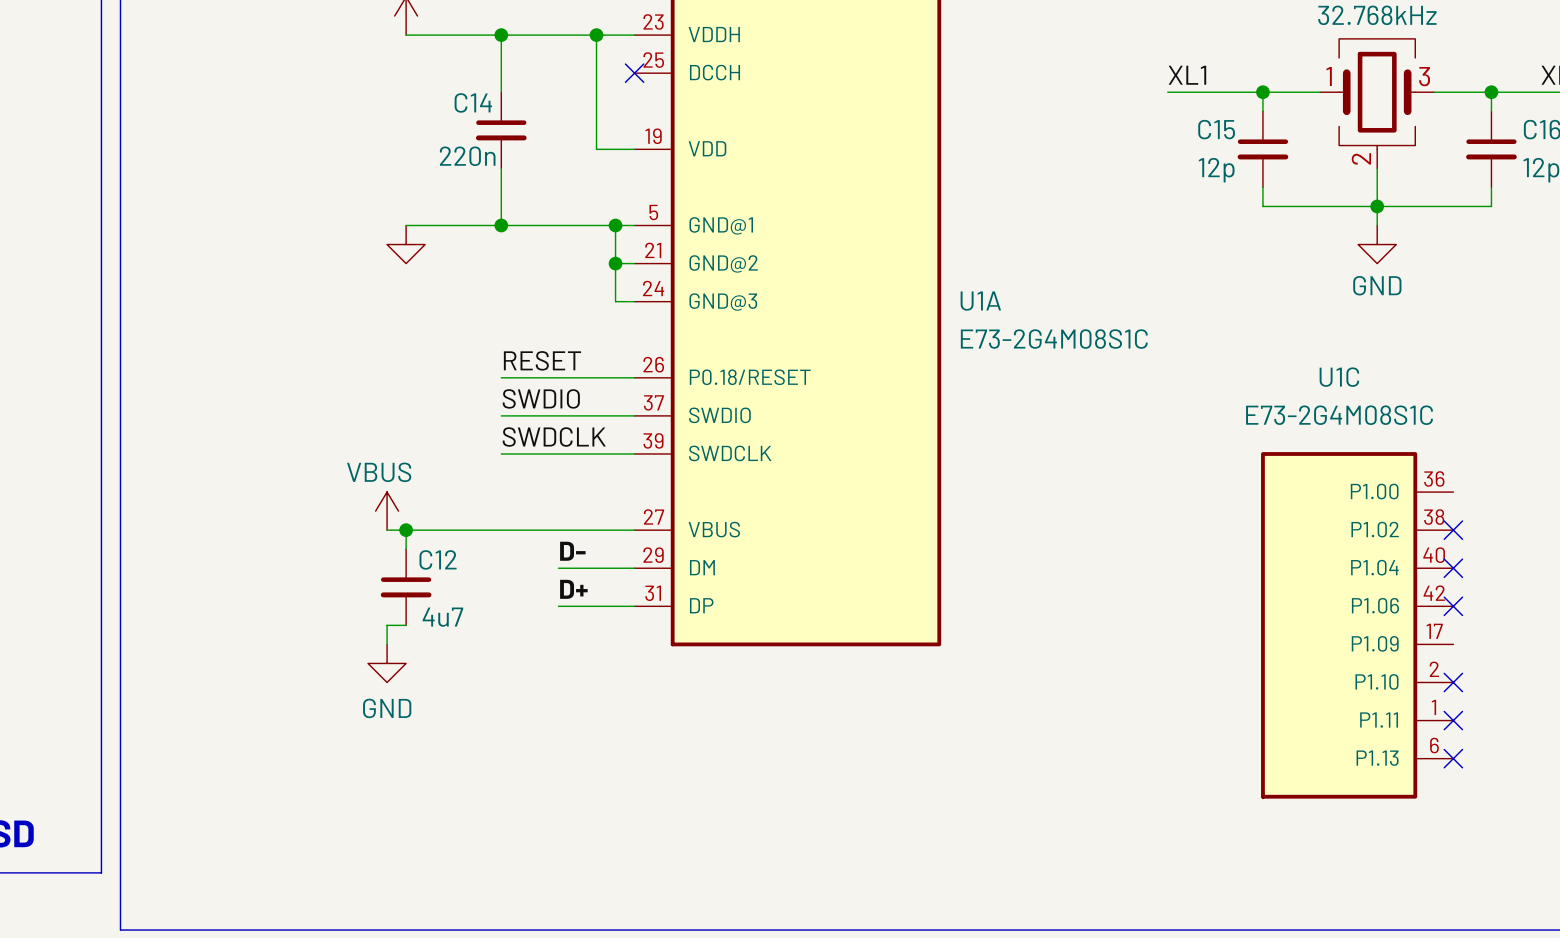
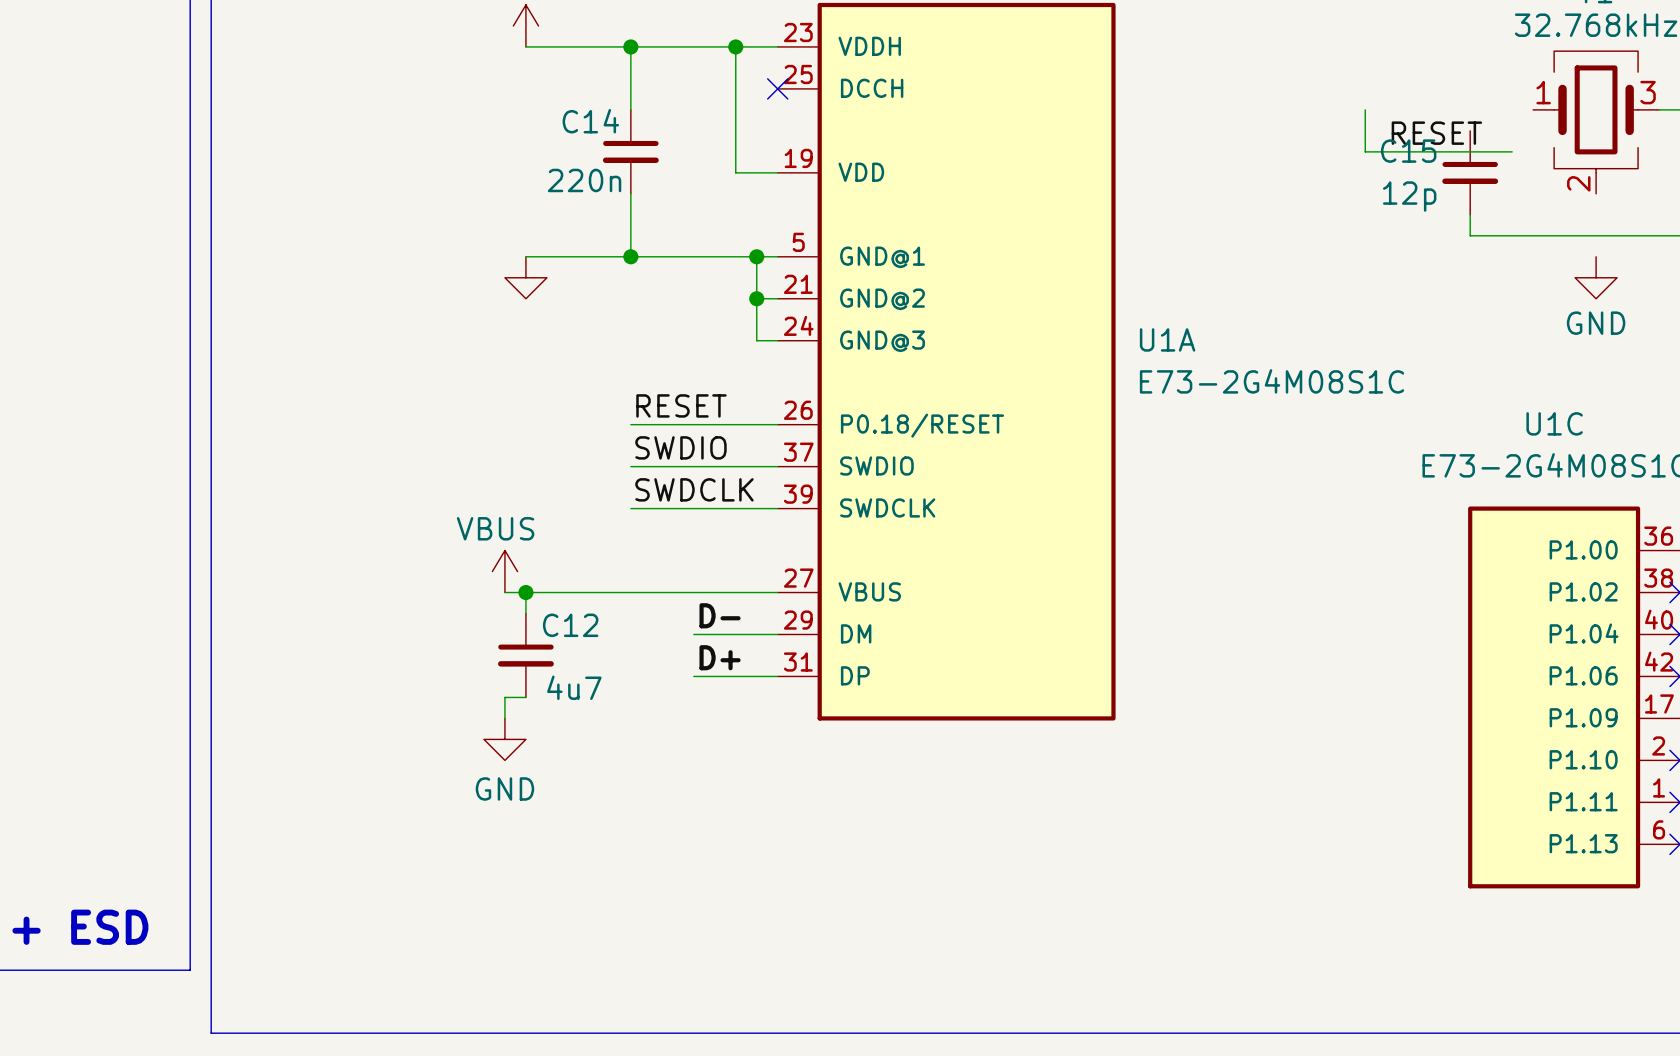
label: XL1 (1187, 75) -> none
wire: (1167, 92) (1320, 92) -> (1365, 109) (1365, 151) (1512, 151)
wire: (1262, 92) (1262, 111) -> none
junction: (1262, 92) -> none
label: none -> RESET (1436, 133)
wire: (1377, 168) (1377, 225) -> none
junction: (1377, 206) -> none

